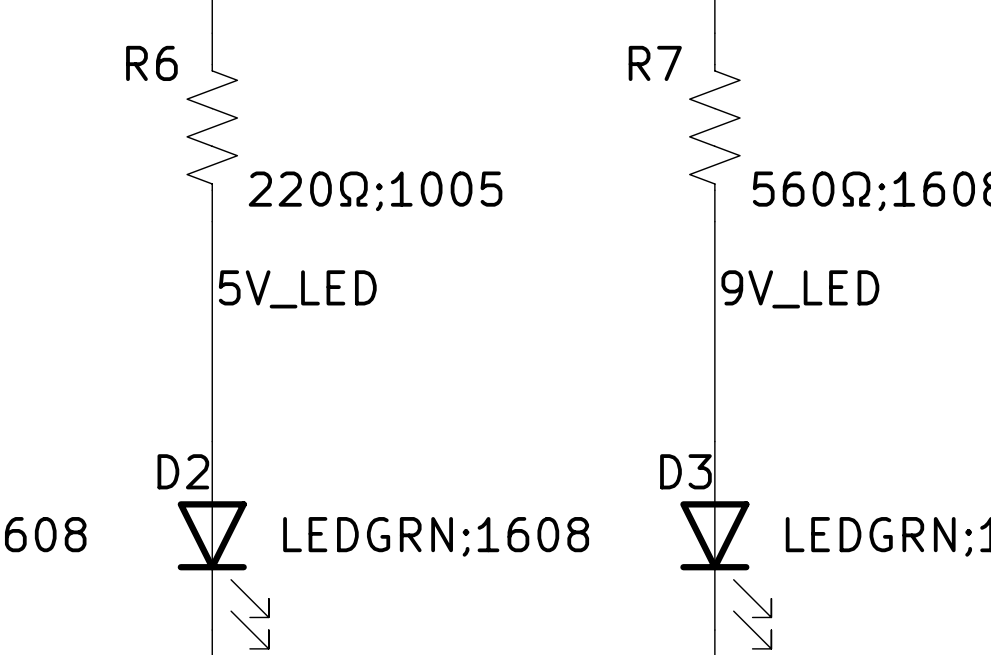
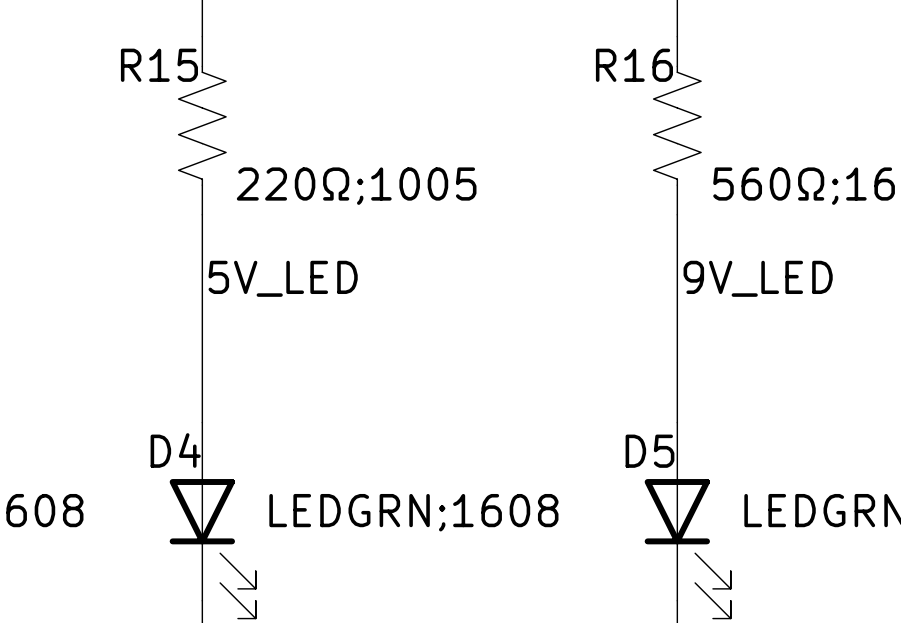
R6 name: R6 (151, 63) -> R15 (159, 65)
R7 name: R7 (655, 63) -> R16 (634, 65)
D2 name: D2 (183, 471) -> D4 (175, 450)
D3 name: D3 (685, 471) -> D5 (649, 451)

